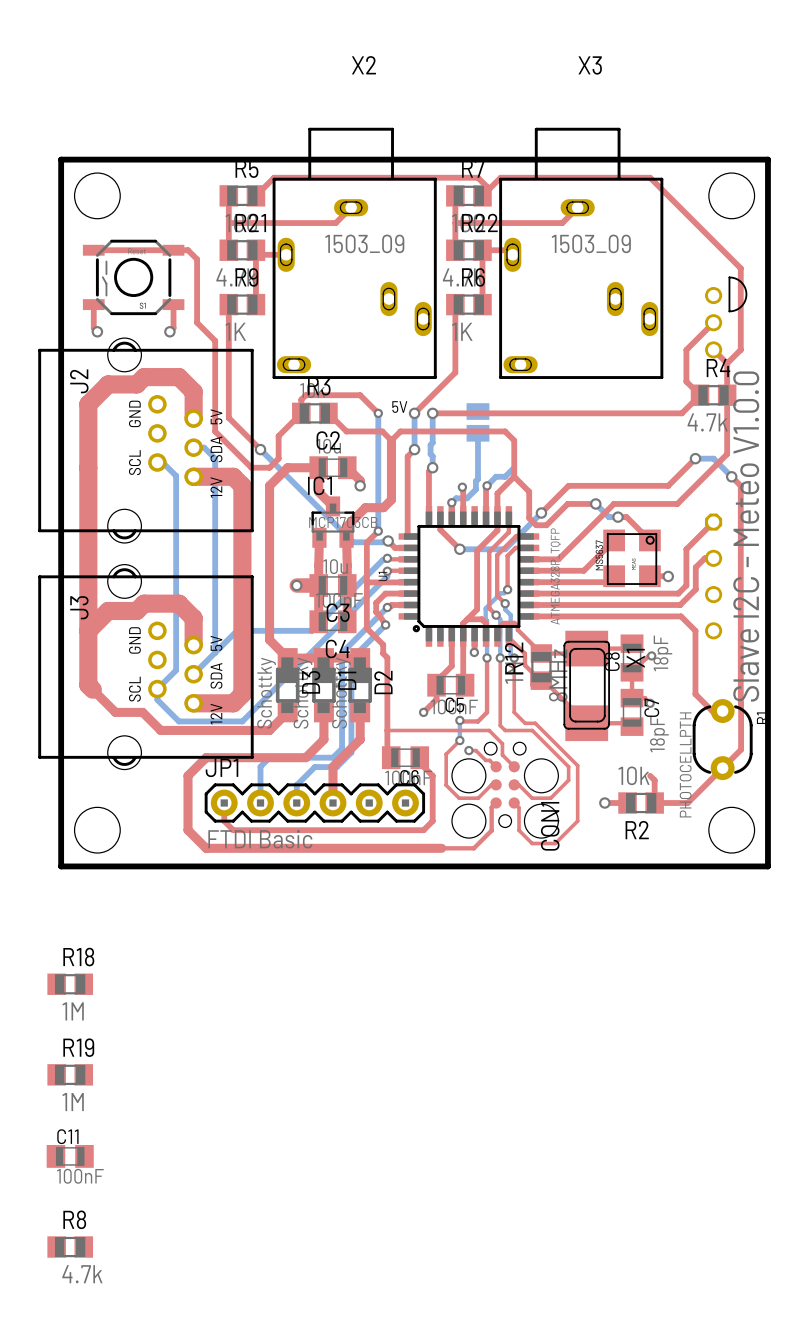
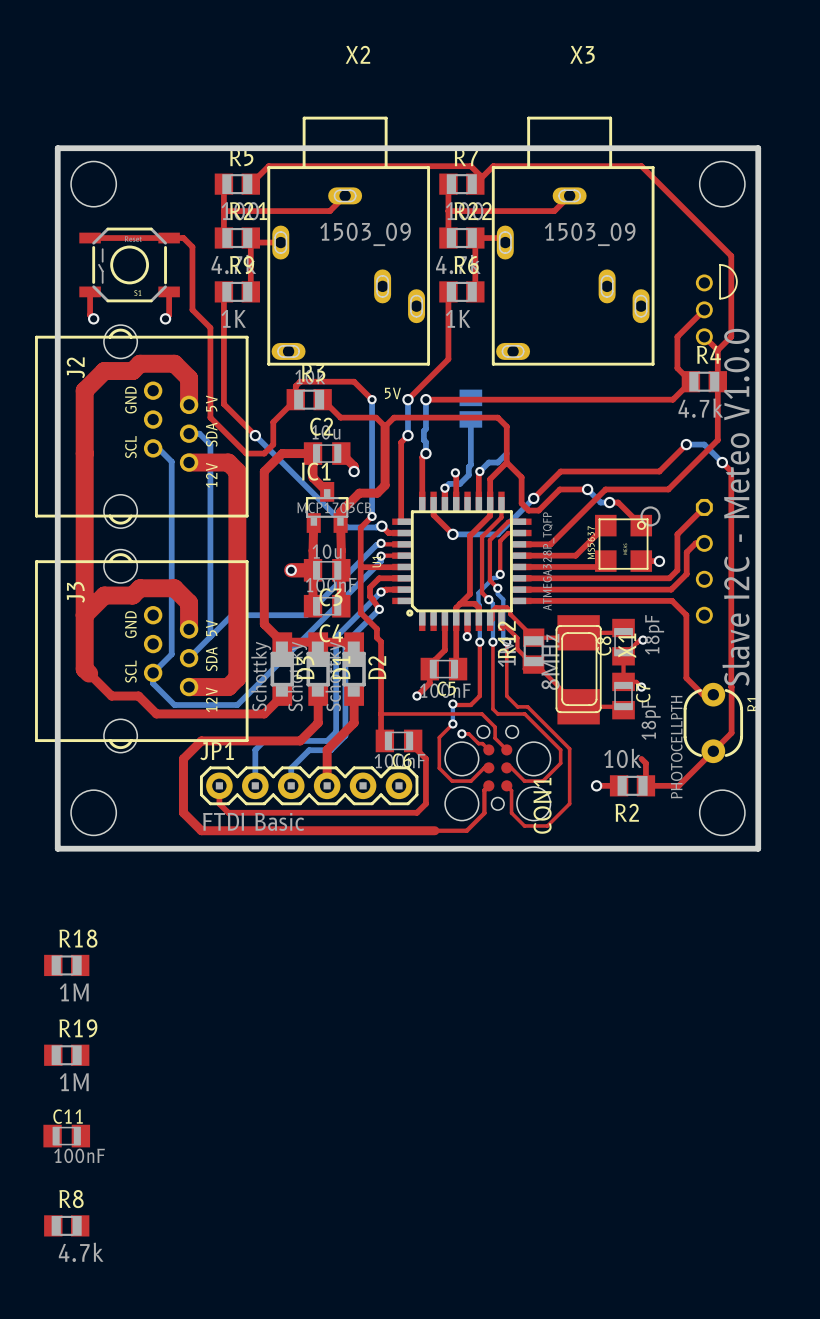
drawing: none -> [640, 506, 661, 527]

